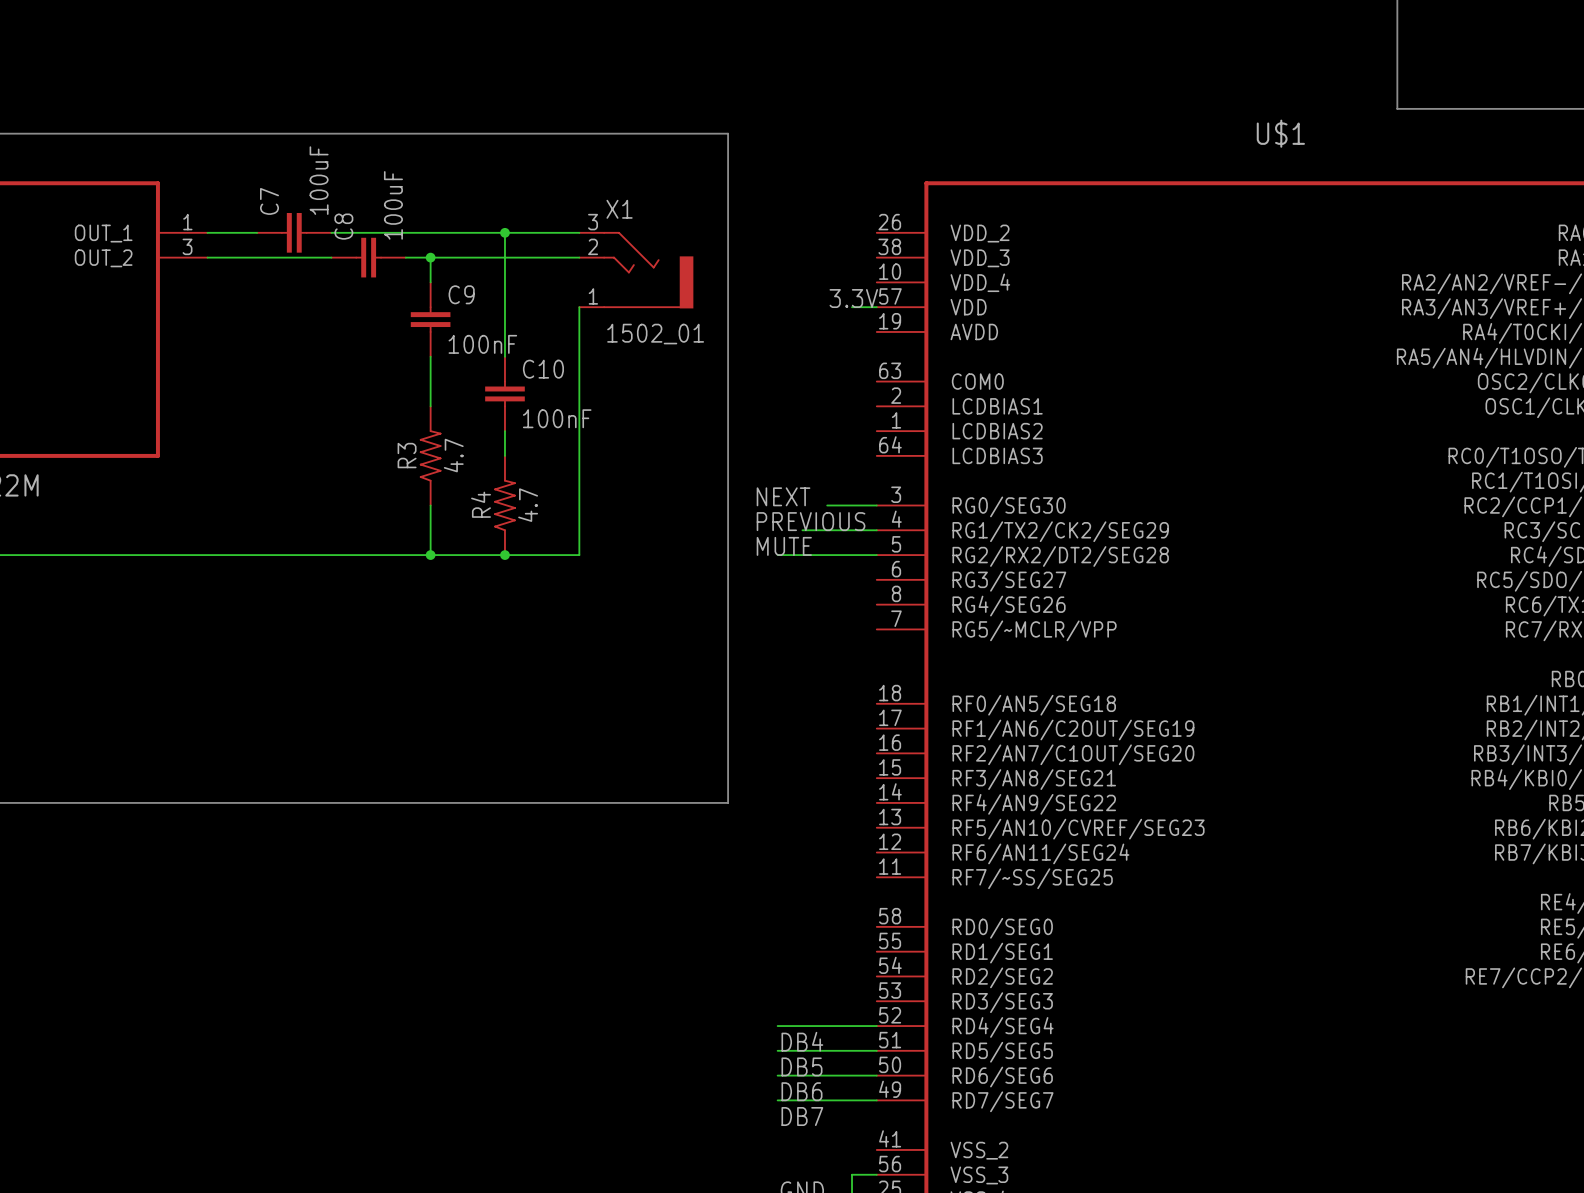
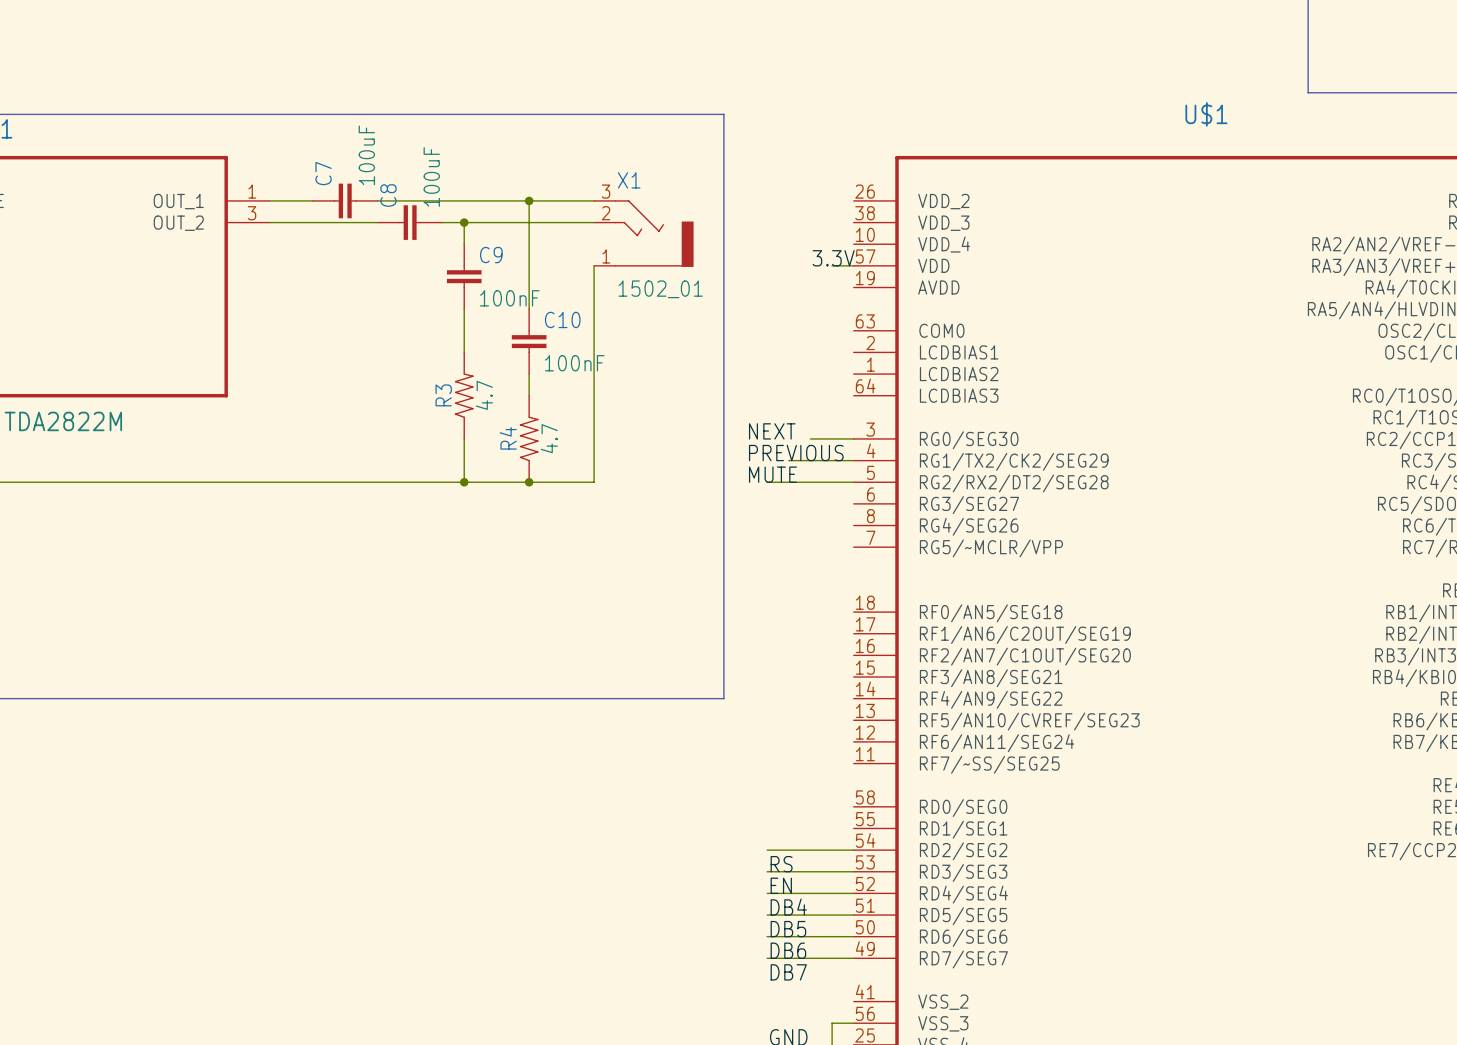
wire: none -> (767, 850) (853, 850)
label: none -> RS (781, 864)
wire: none -> (767, 871) (853, 871)
label: none -> EN (781, 885)

